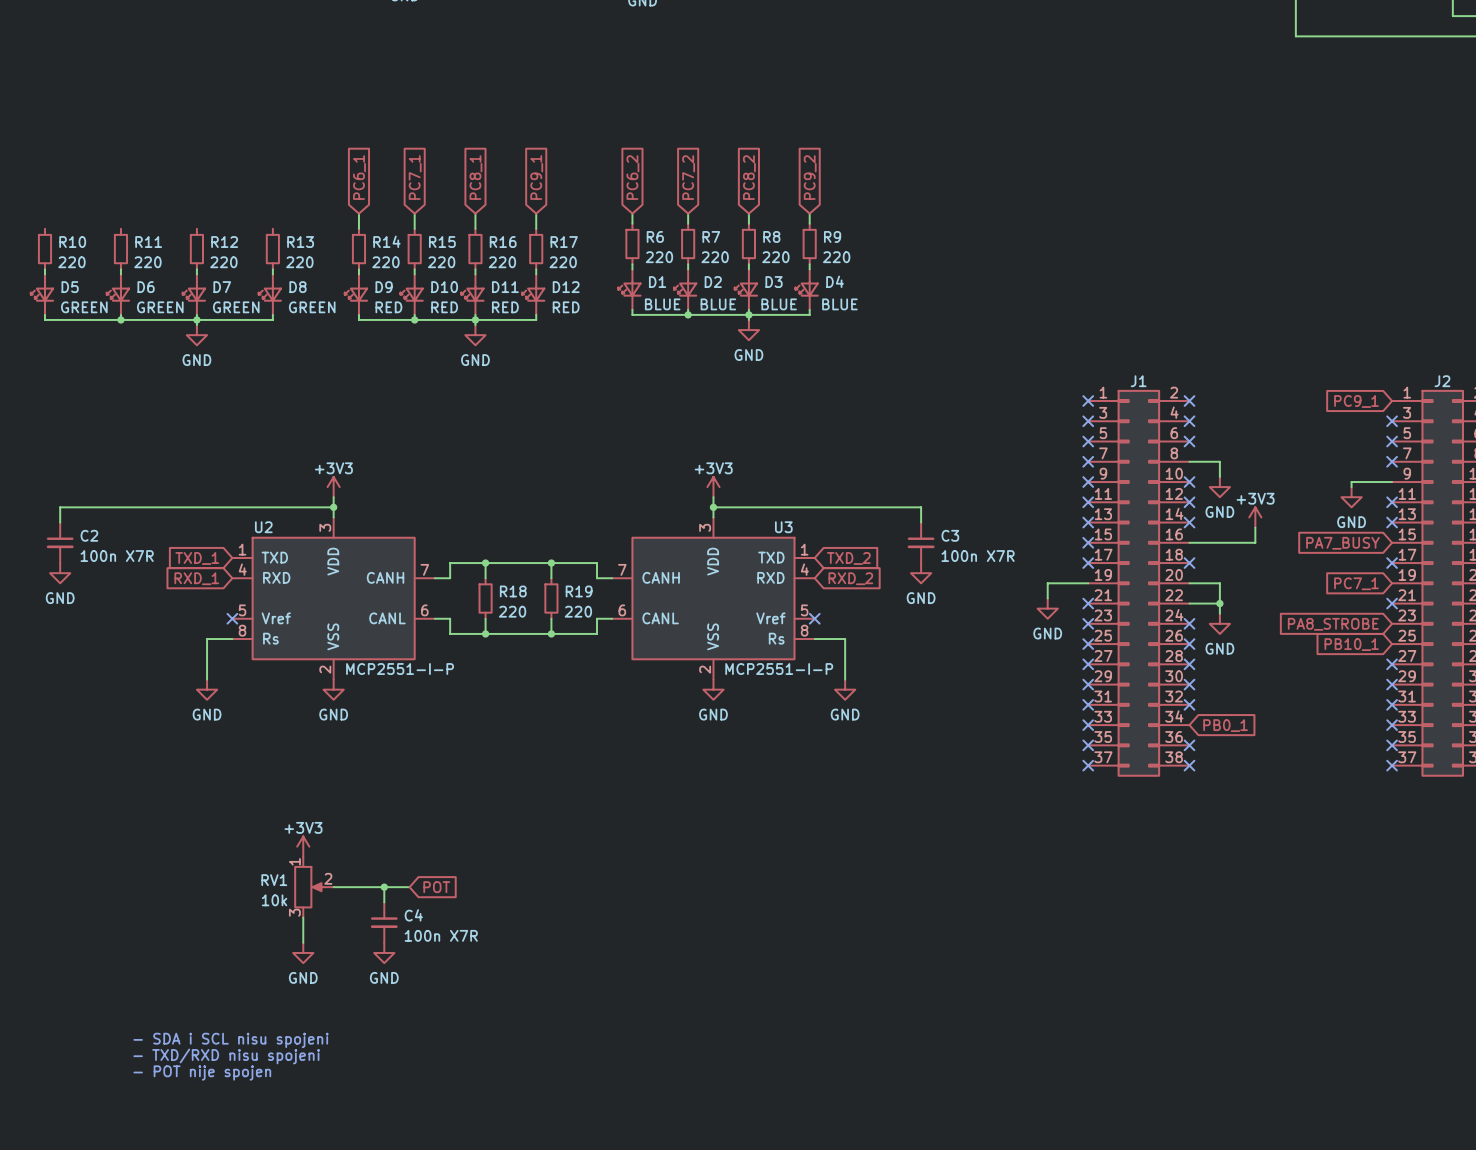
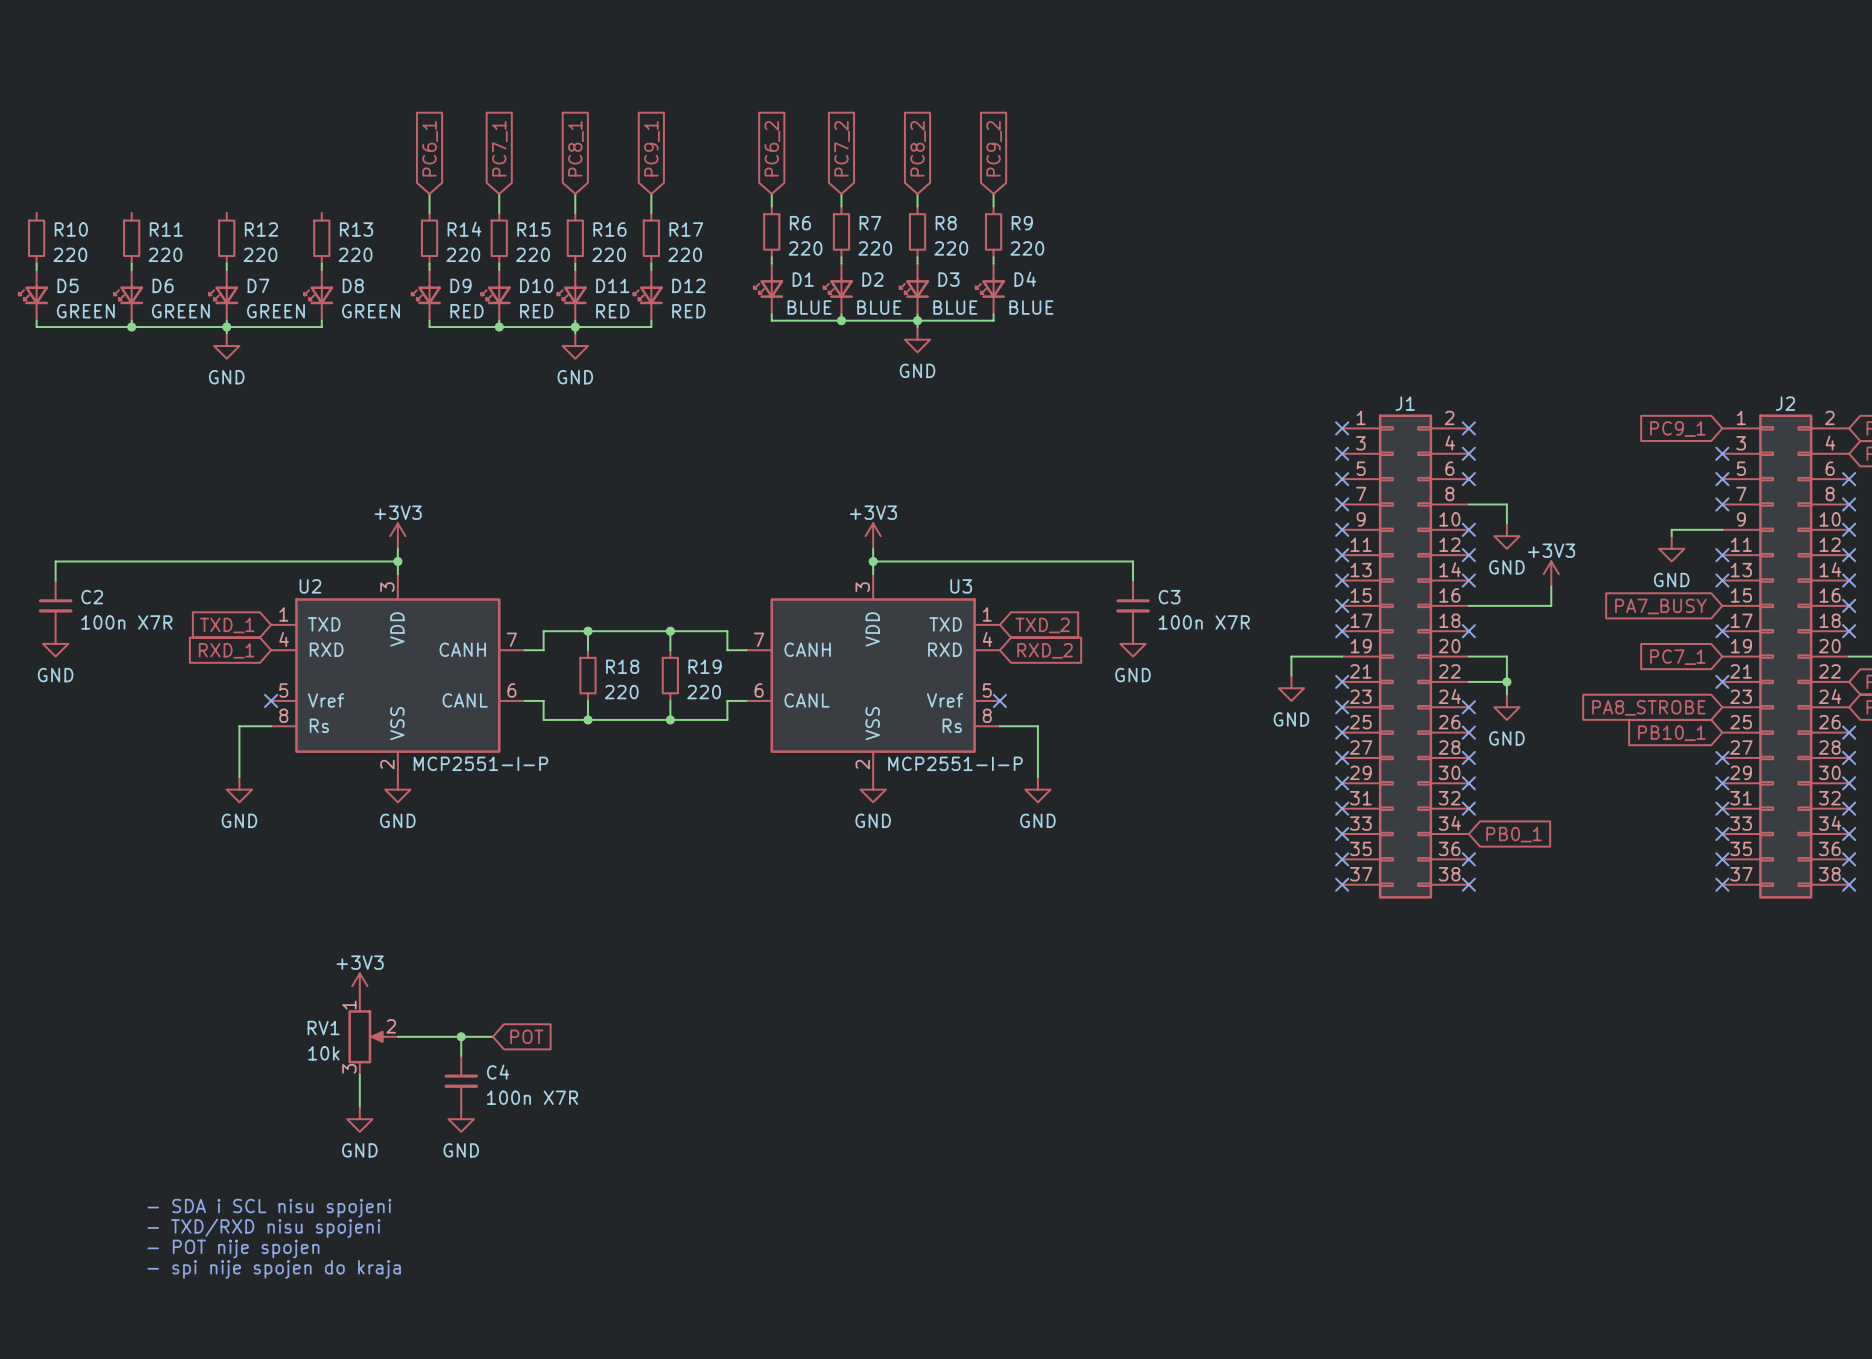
text: none -> - SDA i SCL nisu spojeni (269, 1208)
text: - SDA i SCL nisu spojeni (231, 1040) -> - TXD/RXD nisu spojeni (263, 1228)
text: - TXD/RXD nisu spojeni (226, 1056) -> - POT nije spojen (233, 1248)
text: - POT nije spojen (202, 1072) -> - spi nije spojen do kraja (274, 1269)

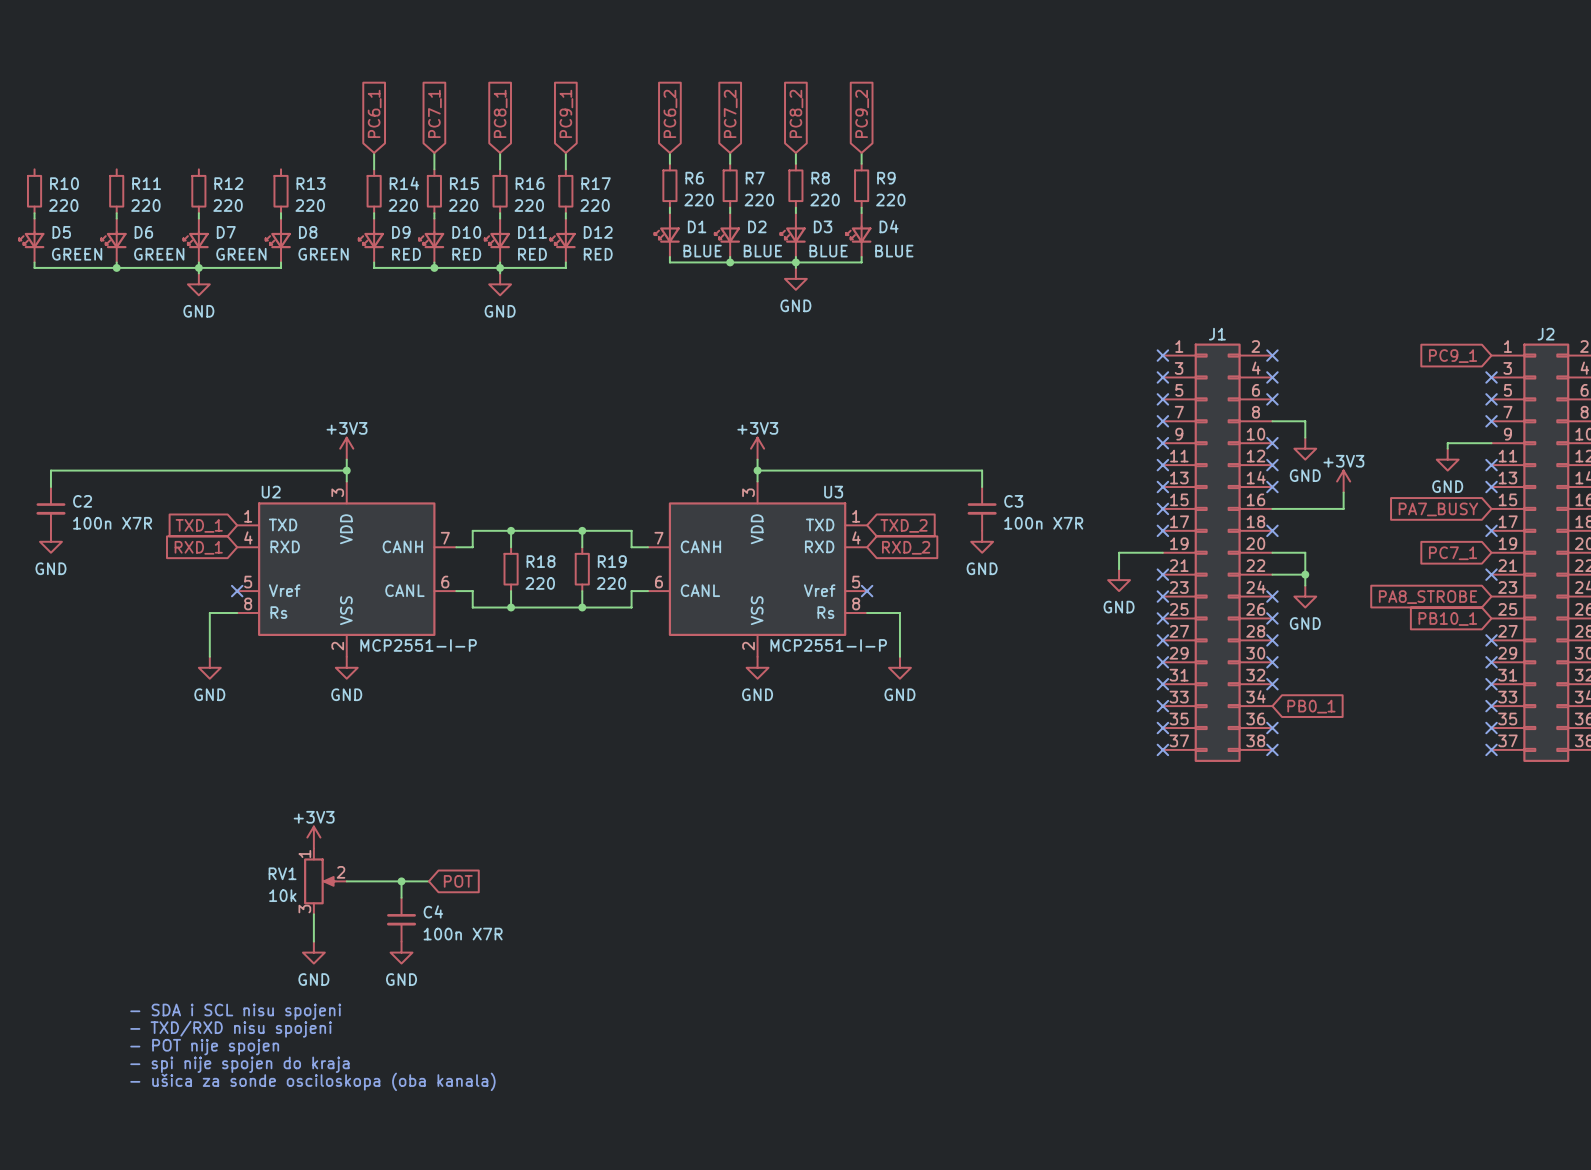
text: none -> - SDA i SCL nisu spojeni (235, 1011)
text: - SDA i SCL nisu spojeni (269, 1208) -> - TXD/RXD nisu spojeni (231, 1029)
text: - TXD/RXD nisu spojeni (263, 1228) -> - POT nije spojen (204, 1047)
text: - POT nije spojen (233, 1248) -> - spi nije spojen do kraja (239, 1064)
text: - spi nije spojen do kraja (274, 1269) -> - ušica za sonde osciloskopa (oba kanala) (312, 1081)

